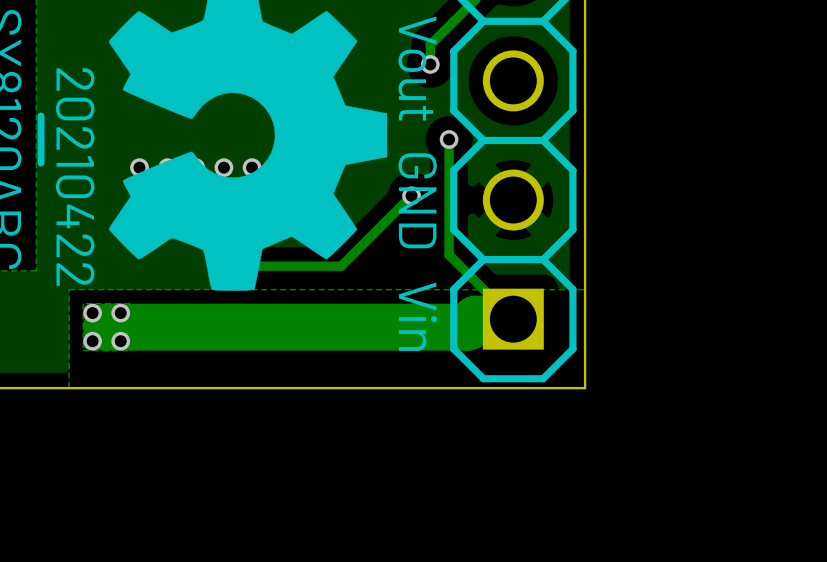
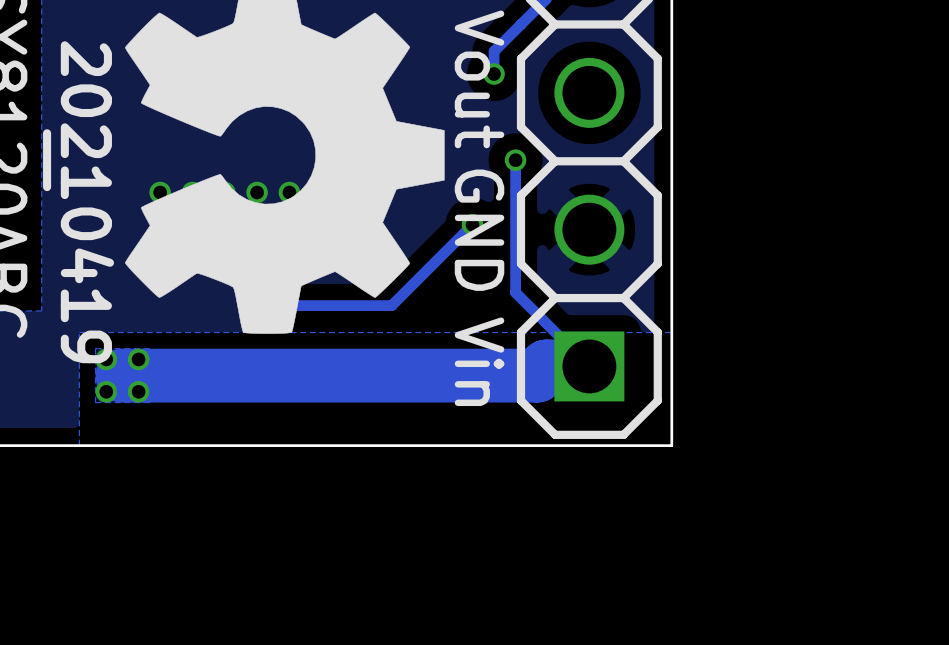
drawing shape: [37, 68, 95, 286] -> [43, 41, 115, 364]

